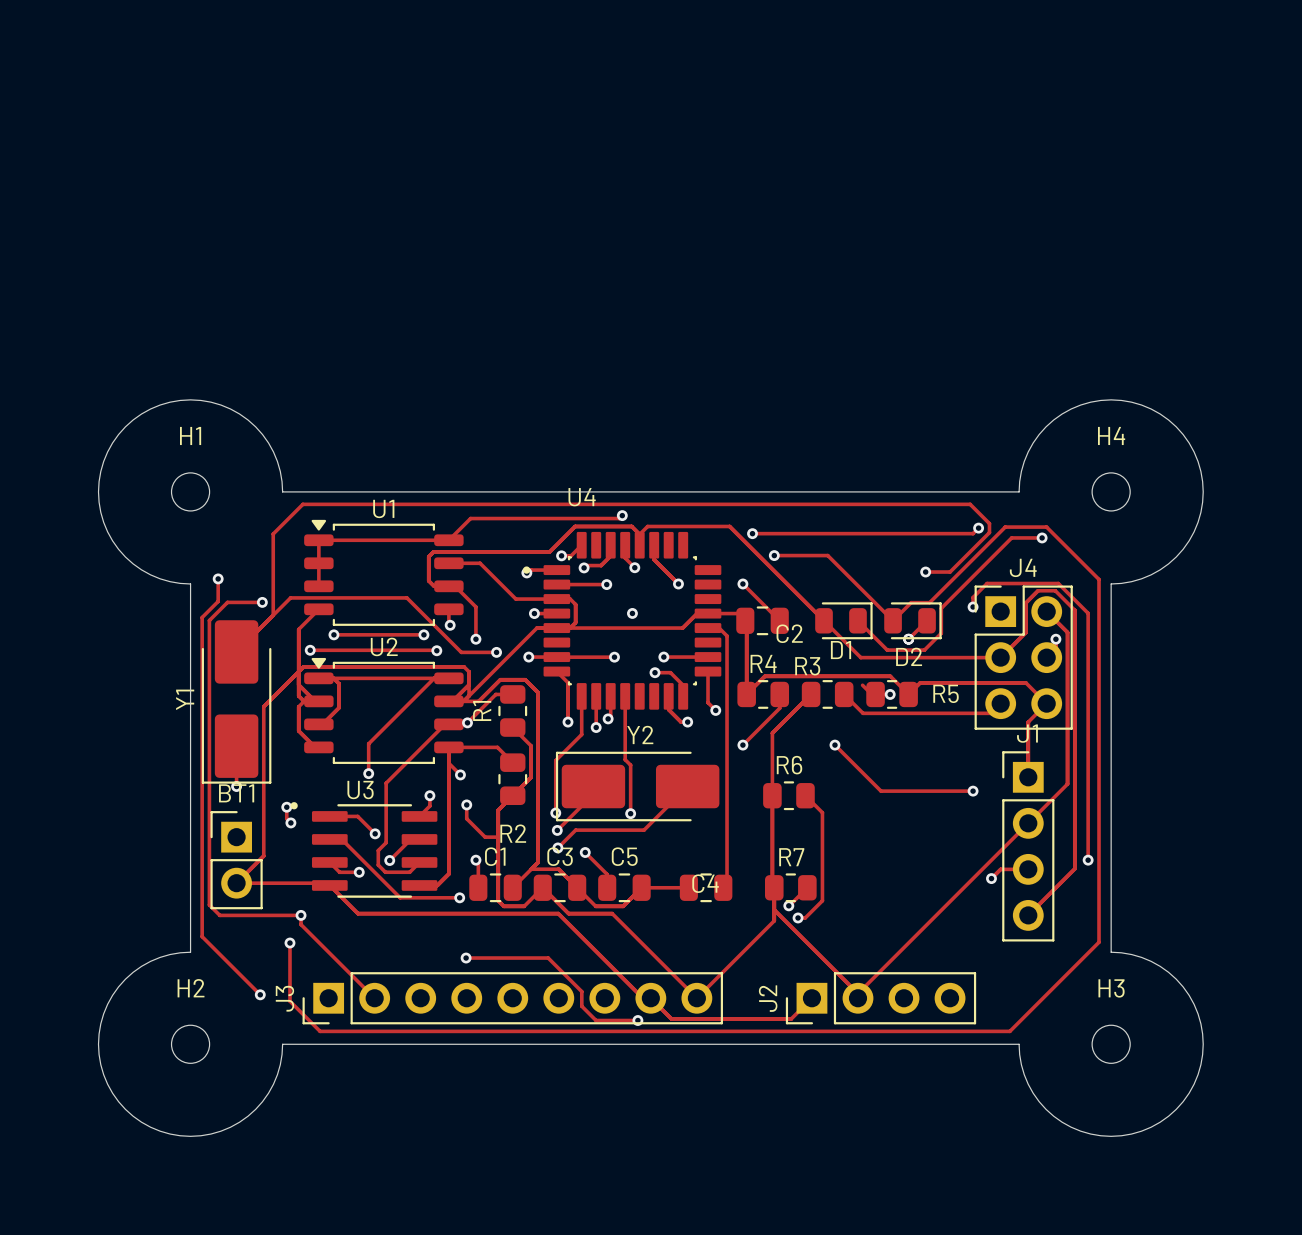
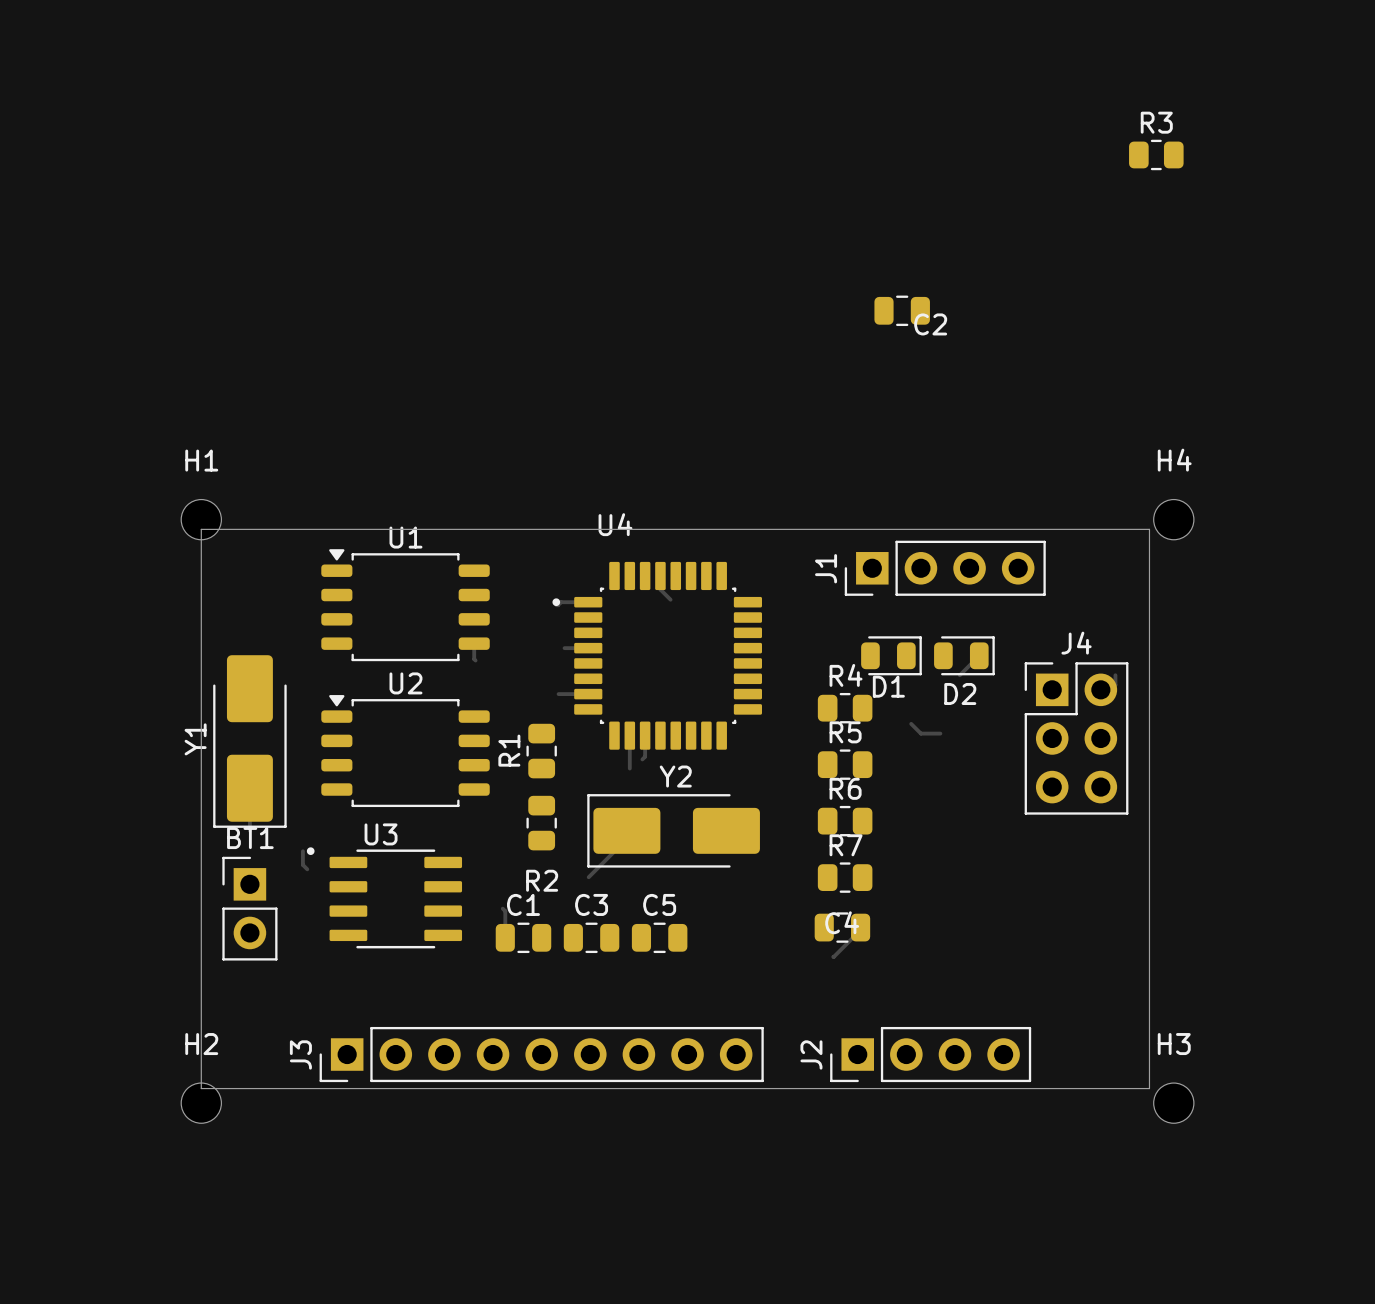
track: (622, 515) (619, 518) (470, 518) (448, 540) (318, 540) (318, 586) -> none
via: (622, 515) -> none
track: (978, 528) (973, 533) (752, 533) -> none
via: (978, 528) -> none
via: (752, 533) -> none
track: (639, 534) (631, 526) (575, 526) (549, 551) (433, 551) (428, 556) (428, 580) (434, 586) (455, 586) (475, 607) (475, 639) -> none
track: (639, 534) (647, 526) (729, 526) (860, 657) (1000, 657) (1025, 632) (1025, 602) (1038, 590) (1055, 590) (1074, 610) (1074, 868) (1028, 915) -> none
track: (1042, 537) (1011, 537) (941, 608) (941, 633) (924, 650) (887, 650) (857, 620) -> none
via: (1042, 537) -> none
track: (581, 545) (571, 555) (561, 555) -> none
track: (610, 545) (610, 556) (601, 565) (586, 565) (584, 567) -> none
track: (654, 545) (654, 559) (678, 583) -> none
via: (561, 555) -> none
track: (774, 555) (827, 555) (893, 620) (911, 602) (929, 602) (1005, 527) (1046, 527) (1099, 579) (1099, 942) (1009, 1031) (320, 1031) (289, 1001) (289, 943) -> none
via: (774, 555) -> none
track: (448, 563) (480, 563) (515, 599) (570, 599) (575, 604) (575, 622) (570, 628) -> none
via: (584, 567) -> none
via: (634, 567) -> none
via: (526, 572) -> none
track: (925, 572) (950, 572) (989, 532) (989, 523) (970, 504) (302, 504) (273, 533) (273, 615) -> none
via: (925, 572) -> none
track: (218, 578) (218, 601) (202, 617) (202, 936) (260, 994) -> none
via: (218, 578) -> none
board edge: (190, 583) (160, 578) (133, 563) (112, 540) (103, 522) (99, 502) (100, 471) (107, 451) (118, 434) (141, 413) (170, 402) (190, 399) (211, 402) (230, 408) (247, 419) (262, 434) (273, 451) (280, 471) (282, 491) (1019, 491) (1021, 471) (1028, 451) (1039, 434) (1062, 413) (1080, 405) (1111, 399) (1131, 402) (1151, 408) (1176, 426) (1189, 442) (1200, 471) (1202, 502) (1194, 531) (1176, 557) (1151, 574) (1131, 581) (1111, 583) (1111, 952) (1131, 954) (1151, 961) (1168, 972) (1183, 986) (1198, 1013) (1202, 1033) (1202, 1054) (1194, 1084) (1176, 1109) (1151, 1127) (1131, 1134) (1111, 1136) (1090, 1134) (1071, 1127) (1046, 1109) (1028, 1084) (1021, 1064) (1019, 1044) (282, 1044) (280, 1064) (273, 1084) (262, 1101) (247, 1116) (230, 1127) (211, 1134) (180, 1135) (150, 1127) (133, 1116) (118, 1101) (103, 1074) (99, 1054) (99, 1033) (107, 1004) (125, 979) (150, 961) (170, 954) (190, 952) -> (201, 616) (201, 529) (1149, 529) (1149, 1088) (201, 1088) (201, 1005)
via: (678, 583) -> none
track: (742, 583) (779, 620) -> none
via: (742, 583) -> none
track: (556, 584) (606, 584) -> none
via: (606, 584) -> none
track: (262, 602) (227, 602) (209, 620) (209, 904) (219, 915) (301, 915) (301, 924) (374, 998) -> none
via: (262, 602) -> none
track: (973, 607) (973, 597) (987, 583) (1058, 583) (1088, 613) (1088, 860) -> none
via: (973, 607) -> none
track: (318, 609) (298, 629) (298, 695) (304, 701) -> none
track: (1046, 611) (1067, 632) (1067, 784) (857, 993) (857, 998) (853, 998) (853, 989) (774, 909) -> none
via: (534, 613) -> none
via: (632, 613) -> none
C2 position: (762, 620) -> (902, 310)
via: (450, 625) -> none
track: (708, 628) (719, 628) (727, 635) (727, 884) (723, 887) -> none
track: (333, 634) (423, 634) -> none
via: (333, 634) -> none
via: (423, 634) -> none
via: (475, 639) -> none
via: (908, 639) -> none
via: (1055, 639) -> none
track: (310, 650) (436, 650) -> none
via: (310, 650) -> none
via: (436, 650) -> none
track: (236, 651) (290, 597) (406, 597) (461, 652) (496, 652) -> none
via: (496, 652) -> none
via: (528, 657) -> none
track: (556, 657) (614, 657) -> none
via: (614, 657) -> none
track: (663, 657) (708, 657) -> none
via: (663, 657) -> none
J4 position: (1023, 657) -> (1076, 738)
R3 name position: R3 (807, 666) -> R3 (1156, 122)
track: (556, 671) (568, 682) (568, 722) -> none
track: (708, 671) (708, 702) (715, 710) -> none
track: (654, 672) (670, 672) (683, 685) (683, 696) -> none
via: (654, 672) -> none
track: (318, 678) (448, 678) -> none
track: (333, 678) (339, 683) (339, 707) (322, 724) (318, 724) -> none
track: (434, 678) (368, 743) (368, 773) -> none
track: (298, 684) (315, 701) -> none
track: (469, 684) (452, 701) -> none
R5 name position: R5 (946, 693) -> R5 (845, 732)
track: (512, 694) (495, 694) (465, 724) (444, 724) (386, 783) (386, 842) (378, 850) (378, 865) (385, 872) (409, 872) (419, 862) -> none
R4 position: (763, 694) -> (845, 708)
track: (779, 694) (779, 708) (742, 745) -> none
track: (811, 694) (772, 733) (772, 885) (774, 887) (774, 920) (696, 998) (612, 913) (568, 913) (542, 887) (524, 906) (503, 906) (498, 900) (498, 810) (530, 777) (530, 745) (512, 727) -> none
R3 position: (827, 694) -> (1156, 154)
track: (844, 694) (863, 713) (991, 713) (1000, 703) -> none
via: (890, 694) -> none
R5 position: (892, 694) -> (845, 764)
track: (469, 695) (469, 671) (464, 667) (303, 667) (263, 706) (263, 855) (236, 883) (327, 883) (357, 913) (558, 913) (642, 998) (650, 998) (671, 1019) (791, 1019) (811, 998) -> none
track: (581, 696) (581, 734) (555, 760) (555, 813) -> none
track: (625, 696) (625, 759) (630, 765) (630, 813) -> none
track: (668, 696) (668, 709) (681, 722) (687, 722) -> none
track: (304, 701) (298, 706) (298, 730) (315, 747) (318, 747) -> none
track: (448, 701) (478, 701) (500, 679) (525, 679) (538, 692) (538, 862) (512, 887) -> none
track: (463, 701) (536, 628) (682, 628) (697, 613) (738, 613) (745, 620) (746, 628) (746, 694) (764, 676) (890, 676) (908, 694) (920, 682) (1025, 682) (1046, 703) (1028, 722) (1028, 777) -> none
via: (715, 710) -> none
via: (608, 718) -> none
via: (467, 722) -> none
via: (568, 722) -> none
via: (687, 722) -> none
via: (596, 727) -> none
via: (742, 745) -> none
track: (834, 745) (881, 791) (973, 791) -> none
via: (834, 745) -> none
track: (512, 762) (497, 747) (448, 747) (448, 873) (437, 885) (419, 885) -> none
track: (448, 763) (460, 774) -> none
via: (368, 773) -> none
via: (460, 774) -> none
via: (236, 786) -> none
track: (687, 786) (644, 830) (575, 830) (557, 847) -> none
via: (973, 791) -> none
track: (429, 795) (429, 806) (419, 816) -> none
via: (429, 795) -> none
R6 position: (788, 795) -> (845, 821)
track: (805, 795) (822, 812) (822, 900) (805, 917) (798, 917) -> none
track: (466, 804) (466, 818) (485, 837) (498, 837) -> none
via: (466, 804) -> none
via: (286, 807) -> none
via: (555, 813) -> none
via: (630, 813) -> none
track: (329, 816) (357, 816) (375, 833) -> none
via: (290, 822) -> none
via: (557, 830) -> none
via: (375, 833) -> none
track: (329, 839) (341, 839) (400, 897) (459, 897) -> none
track: (419, 839) (410, 839) (389, 860) -> none
J1 rotation: 0° (1028, 846) -> 90° counterclockwise (945, 568)
J1 position: (1028, 846) -> (945, 568)
via: (557, 847) -> none
track: (585, 852) (607, 874) (607, 887) -> none
via: (585, 852) -> none
via: (389, 860) -> none
via: (475, 860) -> none
via: (1088, 860) -> none
track: (329, 862) (339, 872) (359, 872) -> none
track: (531, 869) (558, 869) (595, 906) (623, 906) (641, 887) (688, 887) -> none
track: (1028, 869) (1000, 869) (989, 880) -> none
via: (359, 872) -> none
via: (991, 878) -> none
C4 position: (706, 887) -> (842, 927)
R7 position: (790, 887) -> (845, 877)
via: (459, 897) -> none
via: (788, 905) -> none
via: (301, 915) -> none
via: (798, 917) -> none
via: (289, 943) -> none
track: (466, 958) (548, 958) (581, 991) (581, 1006) (596, 1020) (637, 1020) -> none
via: (466, 958) -> none
via: (260, 994) -> none
via: (637, 1020) -> none

